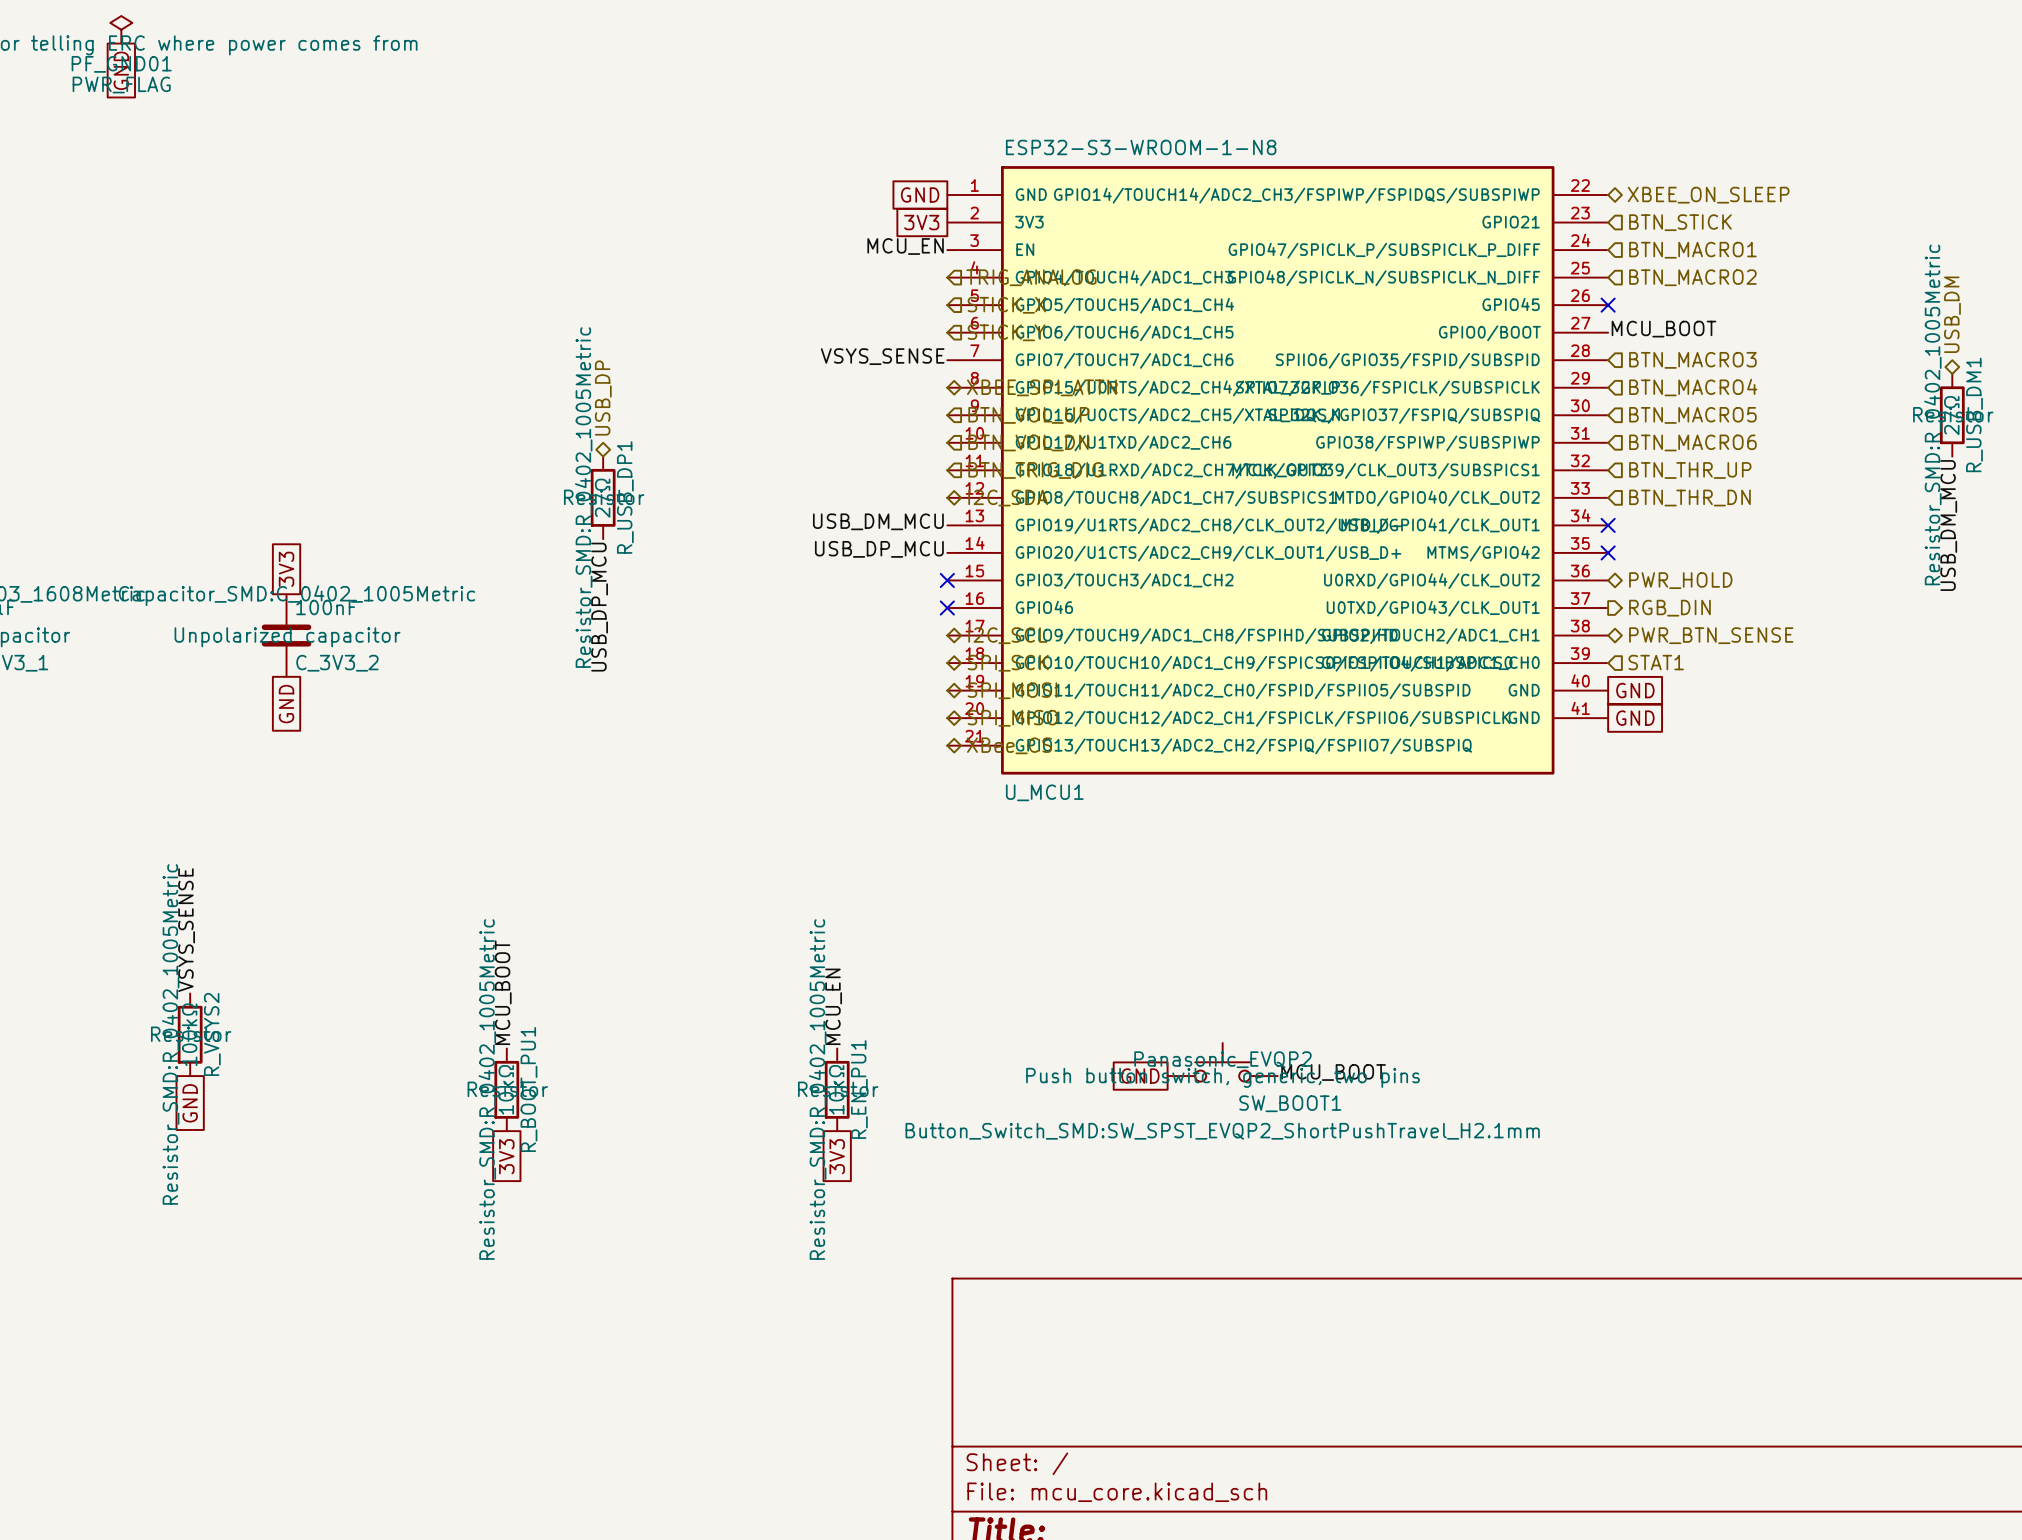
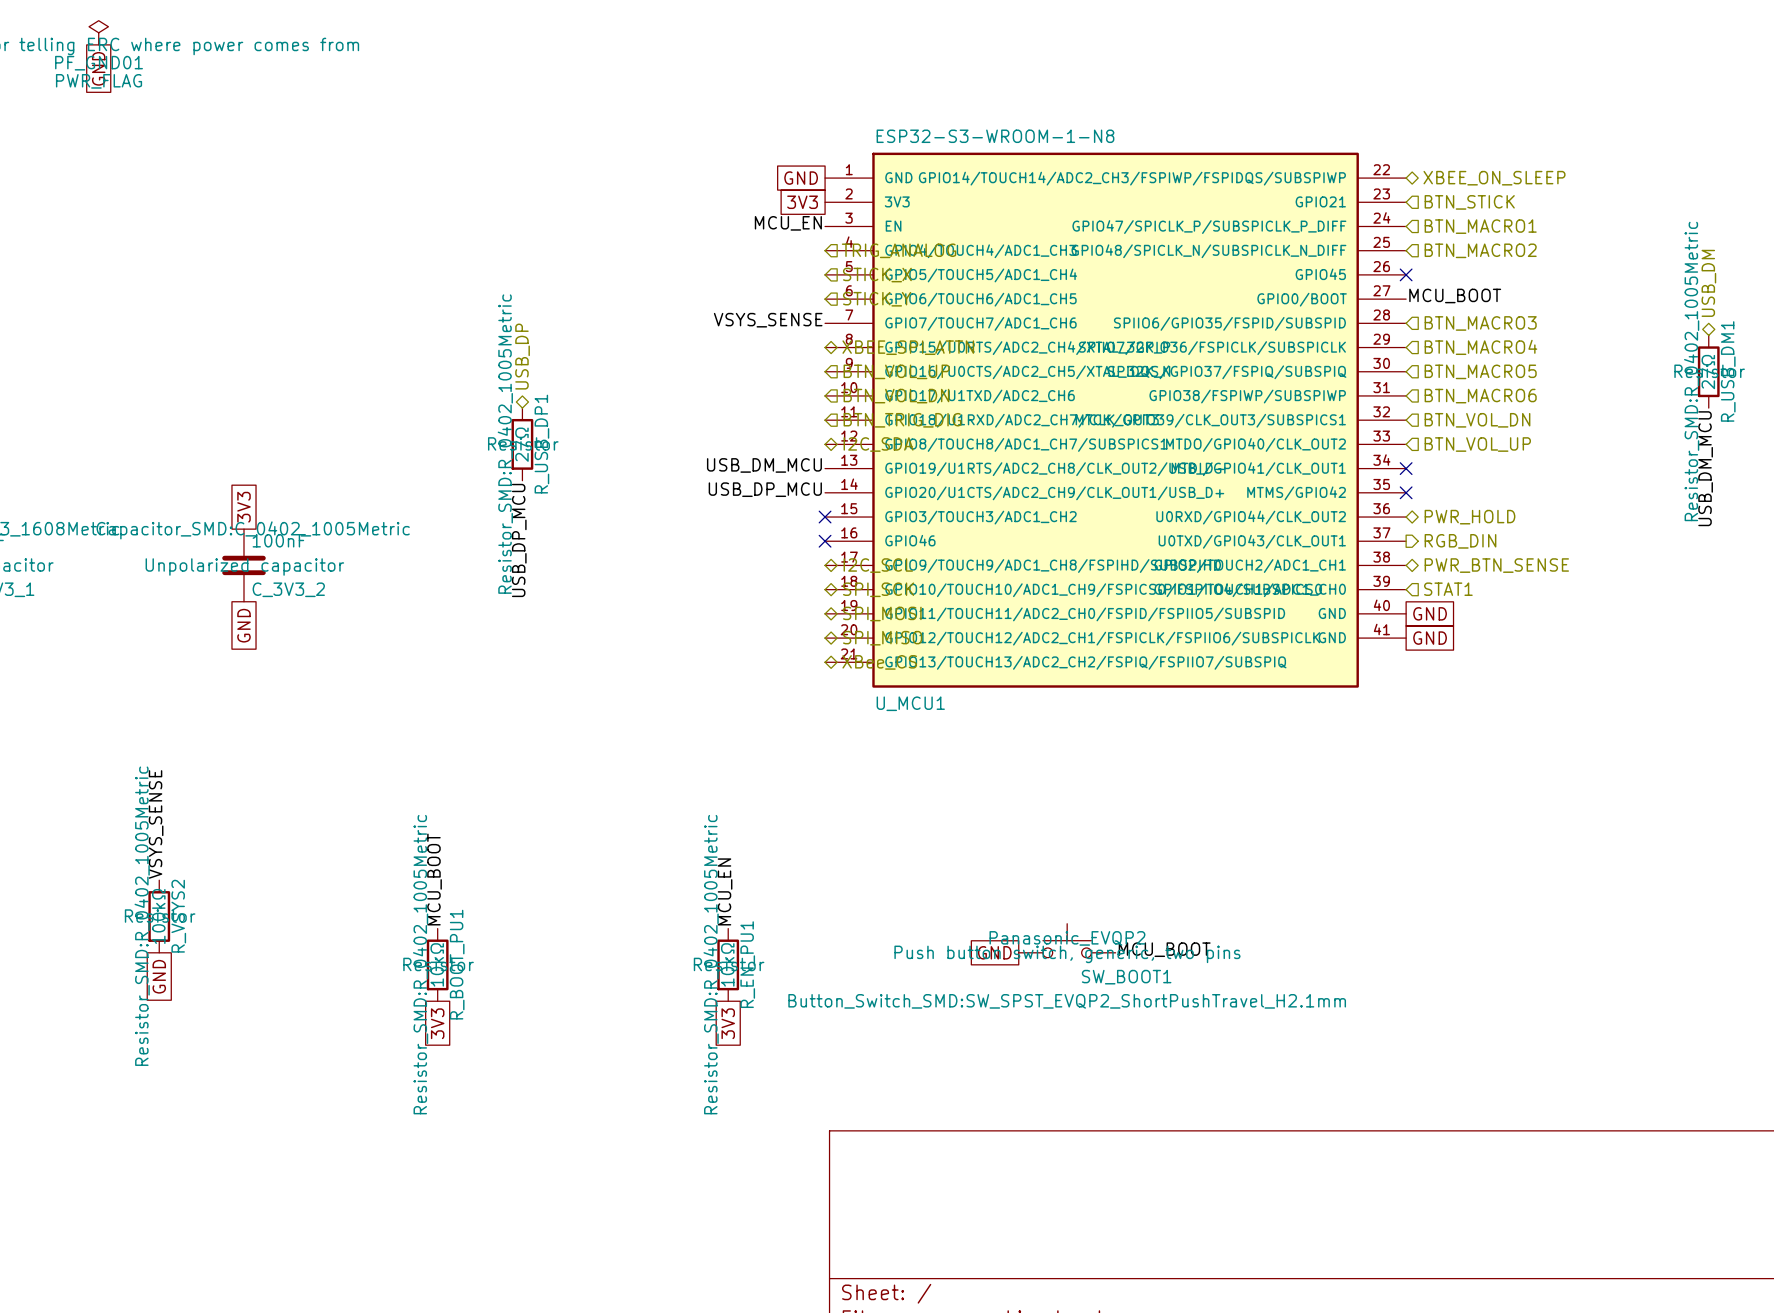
hierarchical label: BTN_THR_UP (1690, 470) -> BTN_VOL_DN (1477, 420)
hierarchical label: BTN_THR_DN (1689, 498) -> BTN_VOL_UP (1477, 444)

